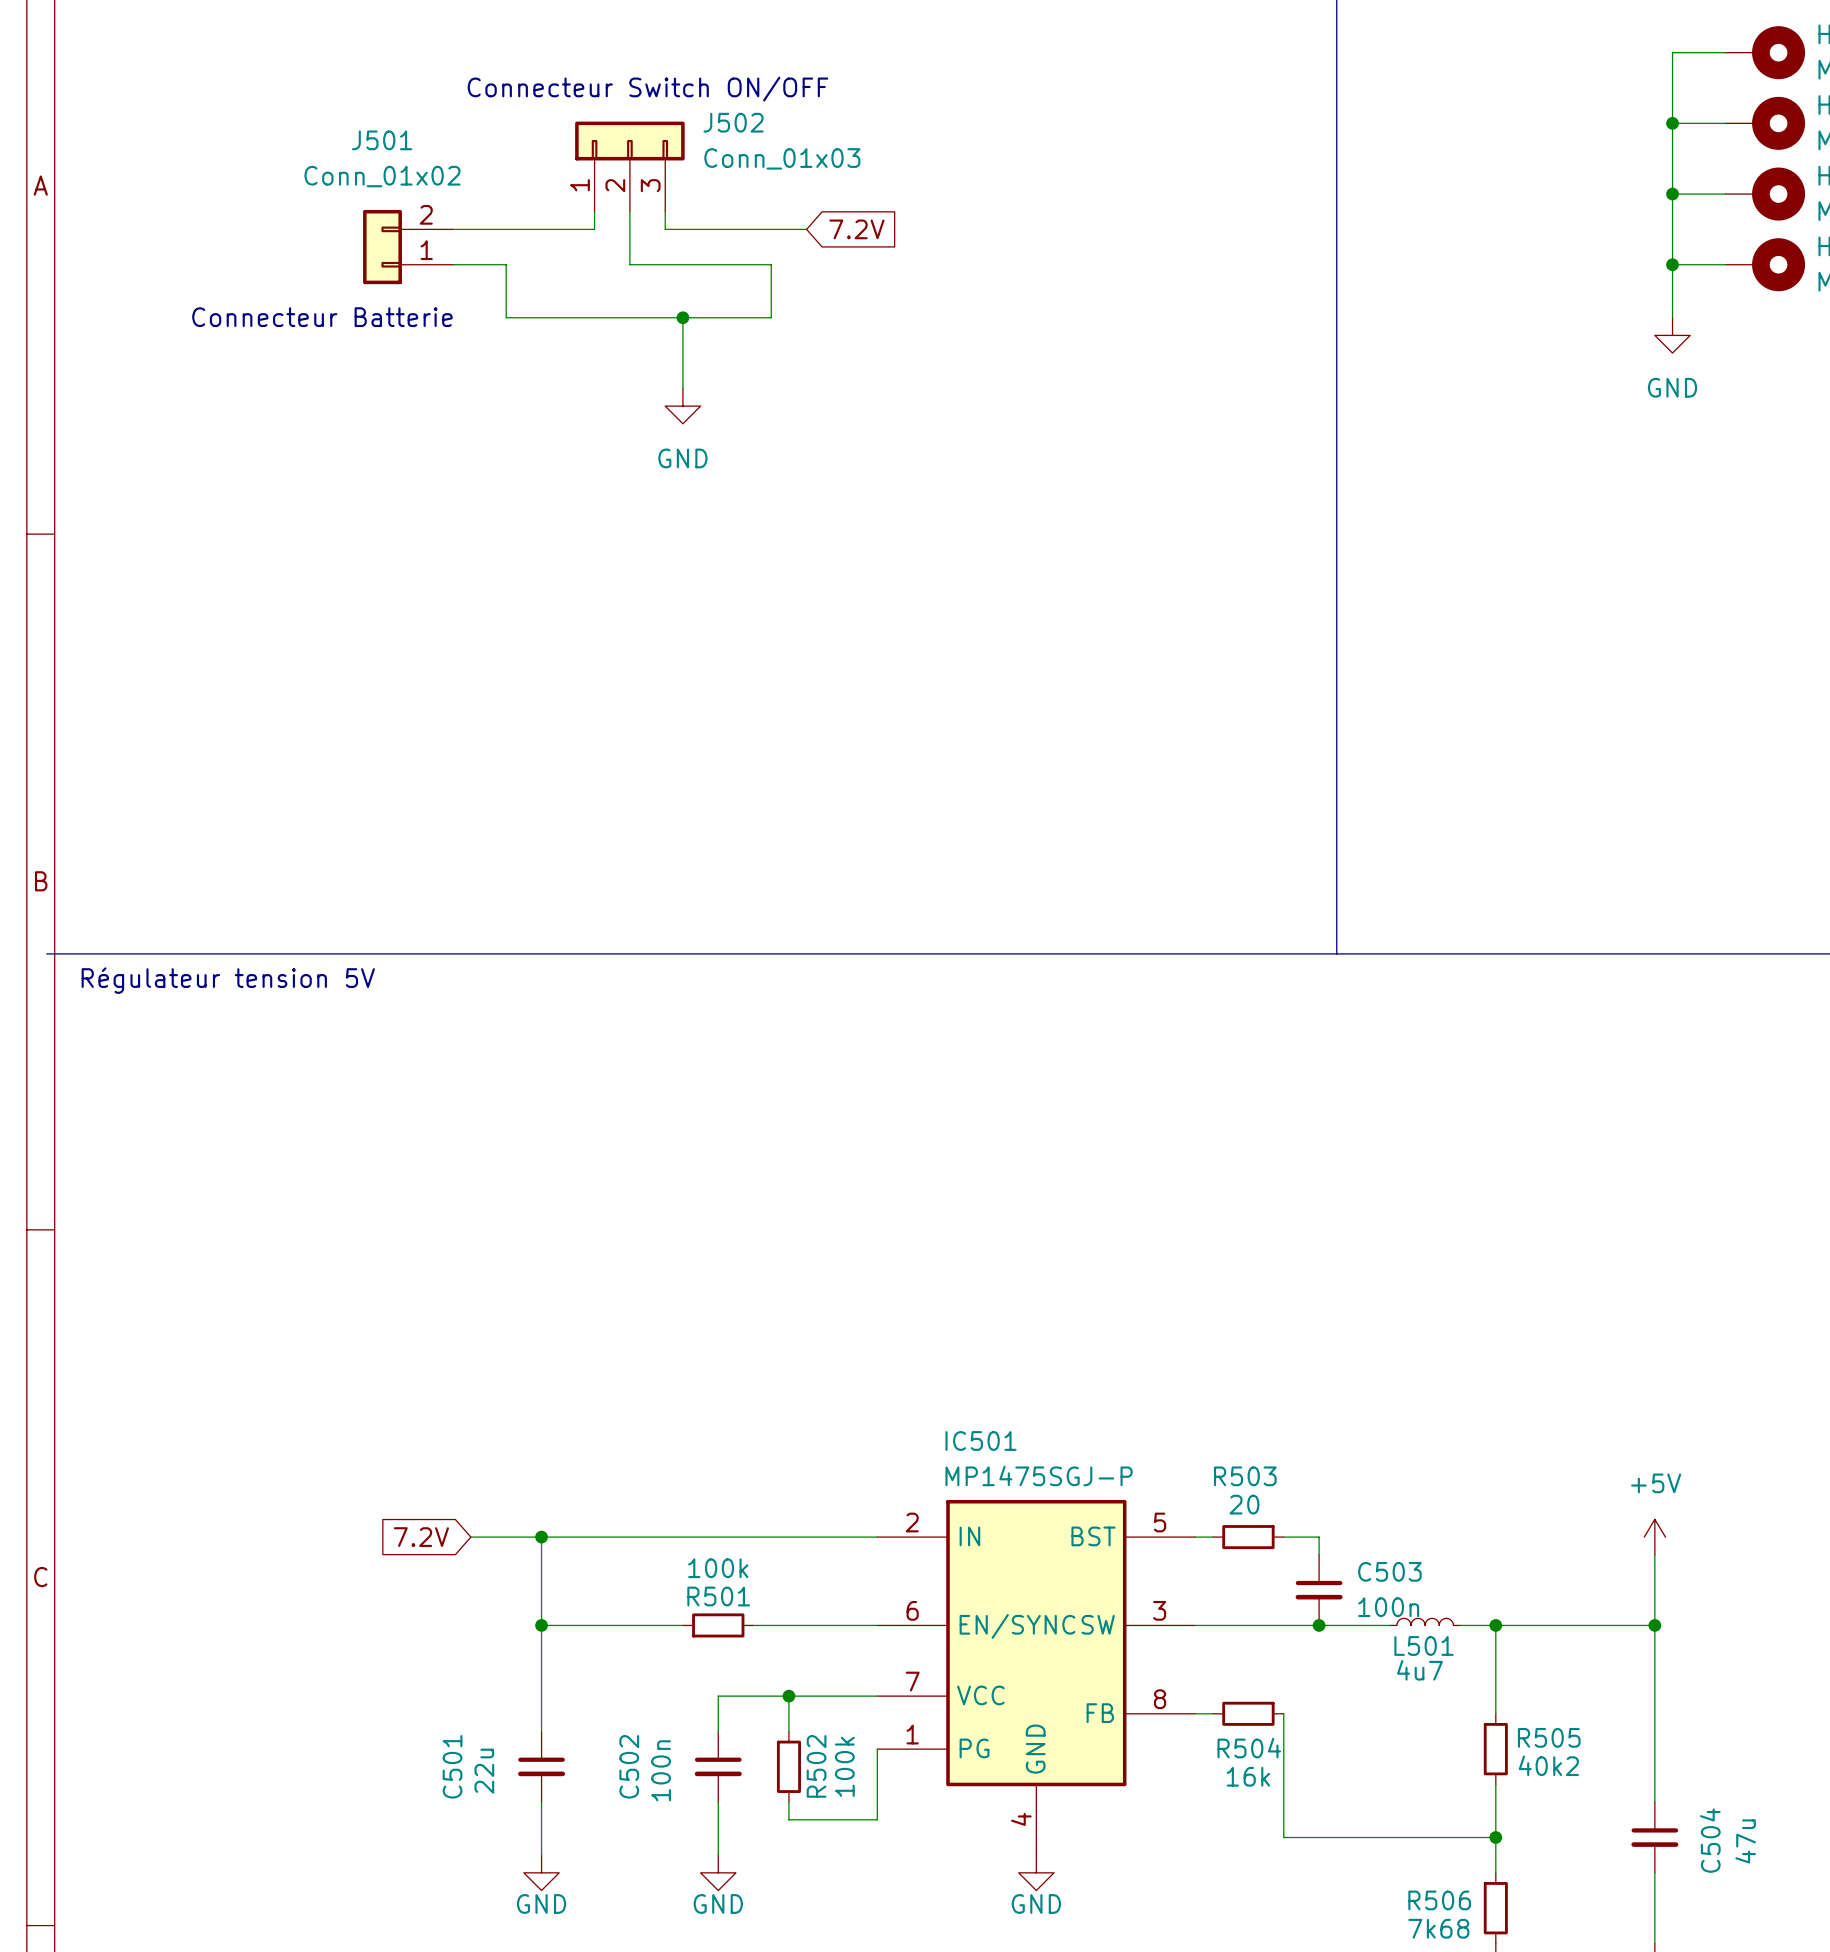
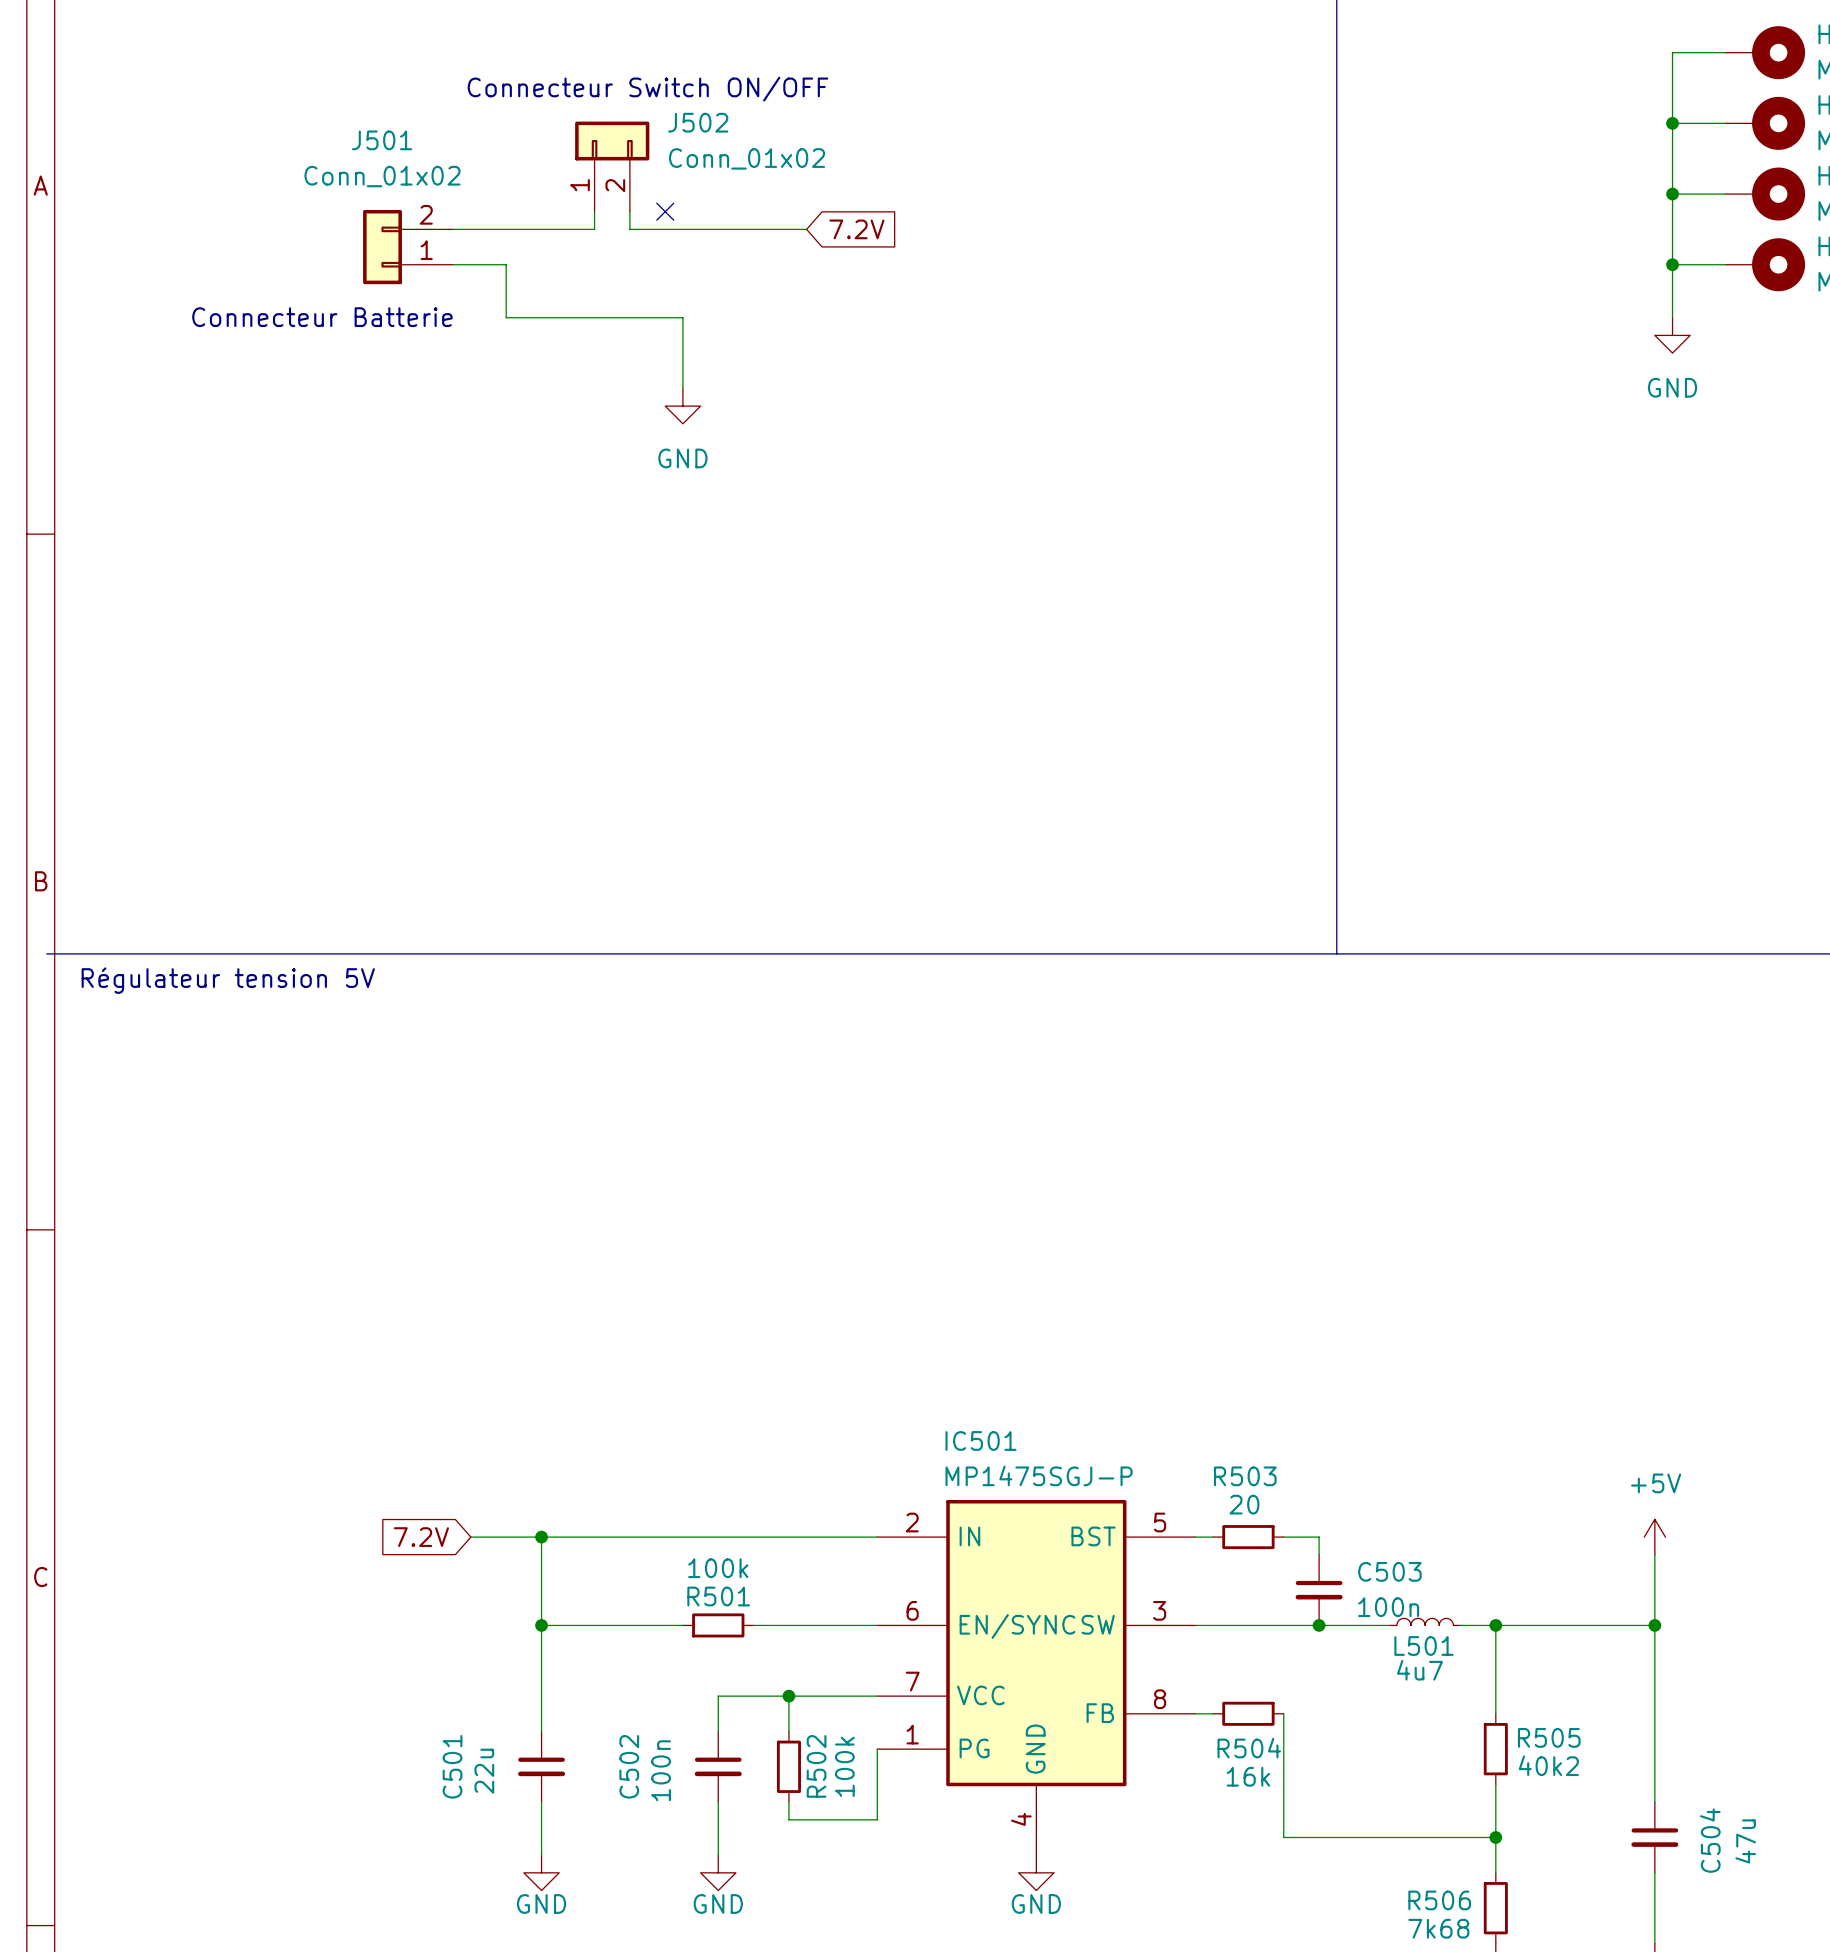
J502 symbol: [575, 121, 685, 212] -> [575, 121, 650, 212]
J502 value: Conn_01x03 (782, 158) -> Conn_01x02 (747, 158)
wire: (665, 211) (665, 229) -> (629, 229) (665, 229)
no-connect mark: none -> (665, 211)
wire: (629, 229) (629, 264) (771, 264) (771, 317) (682, 317) -> none
junction: (682, 317) -> none

